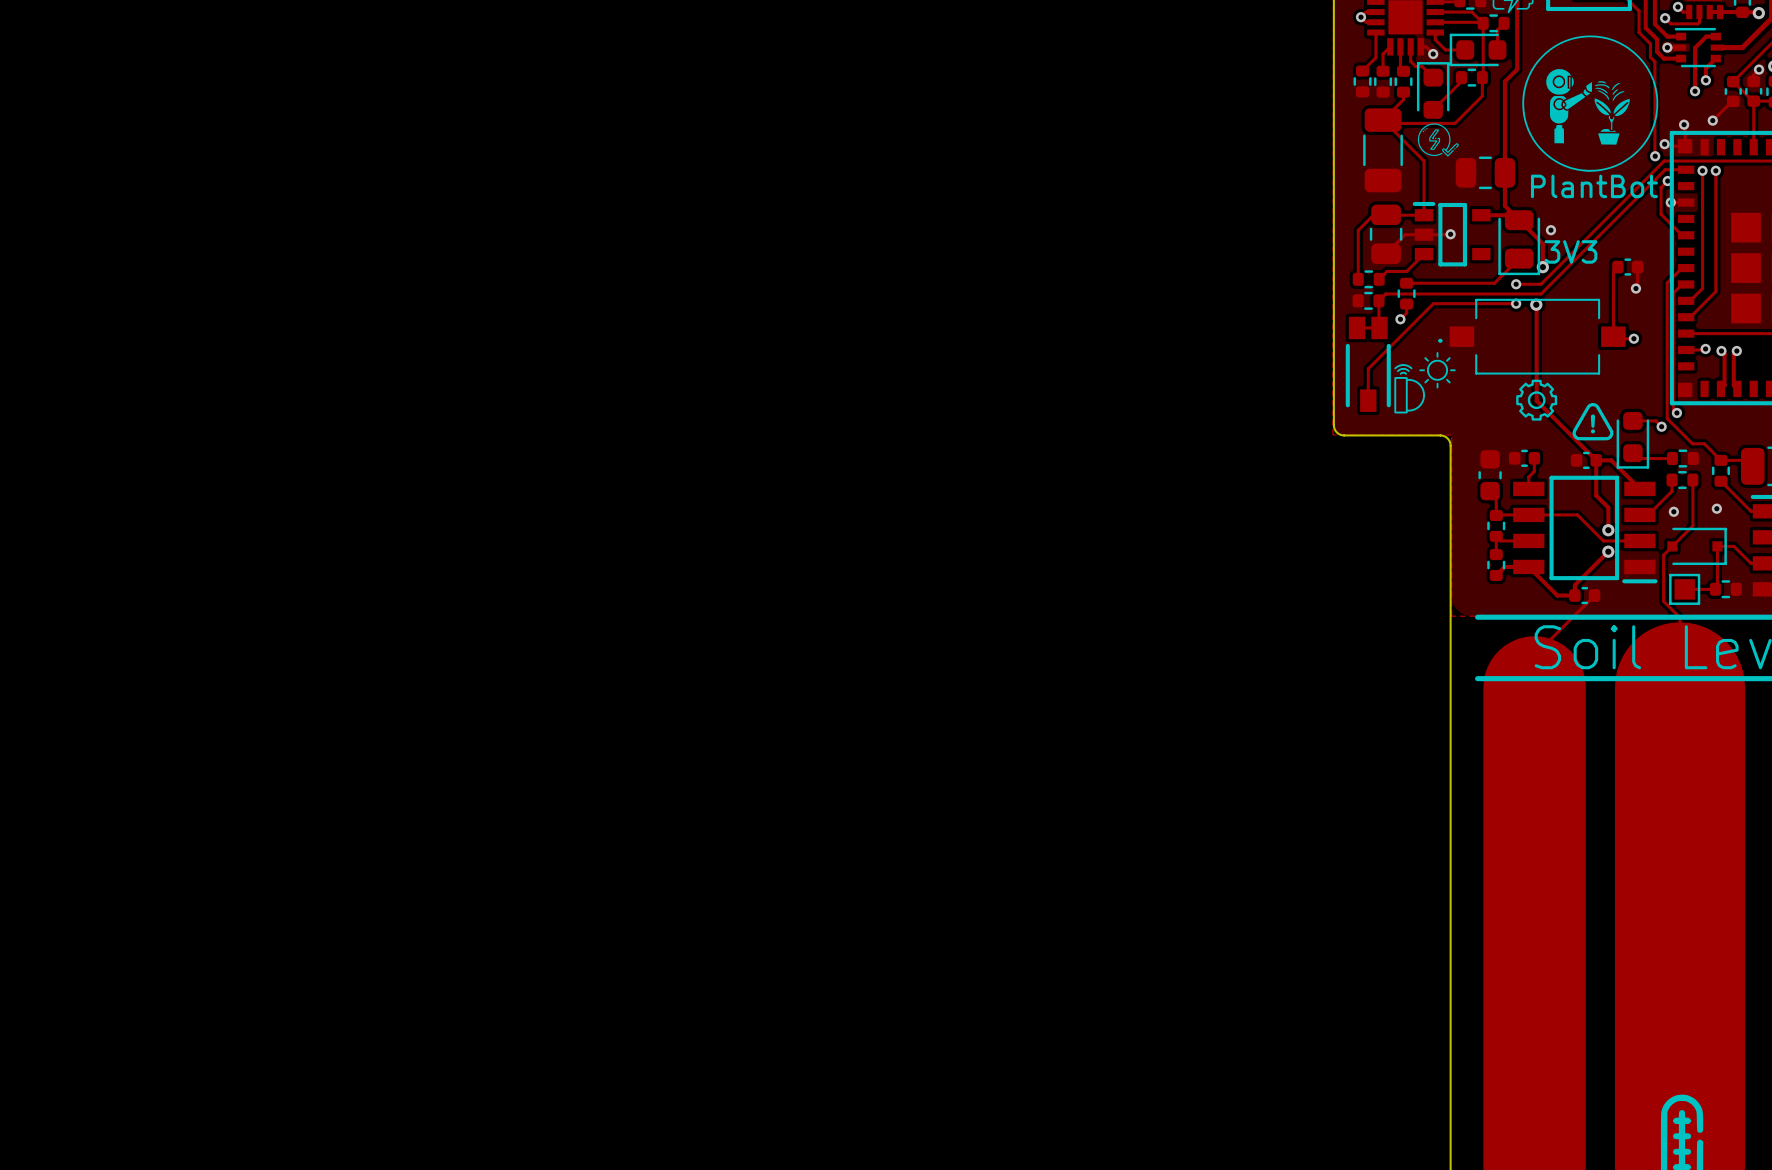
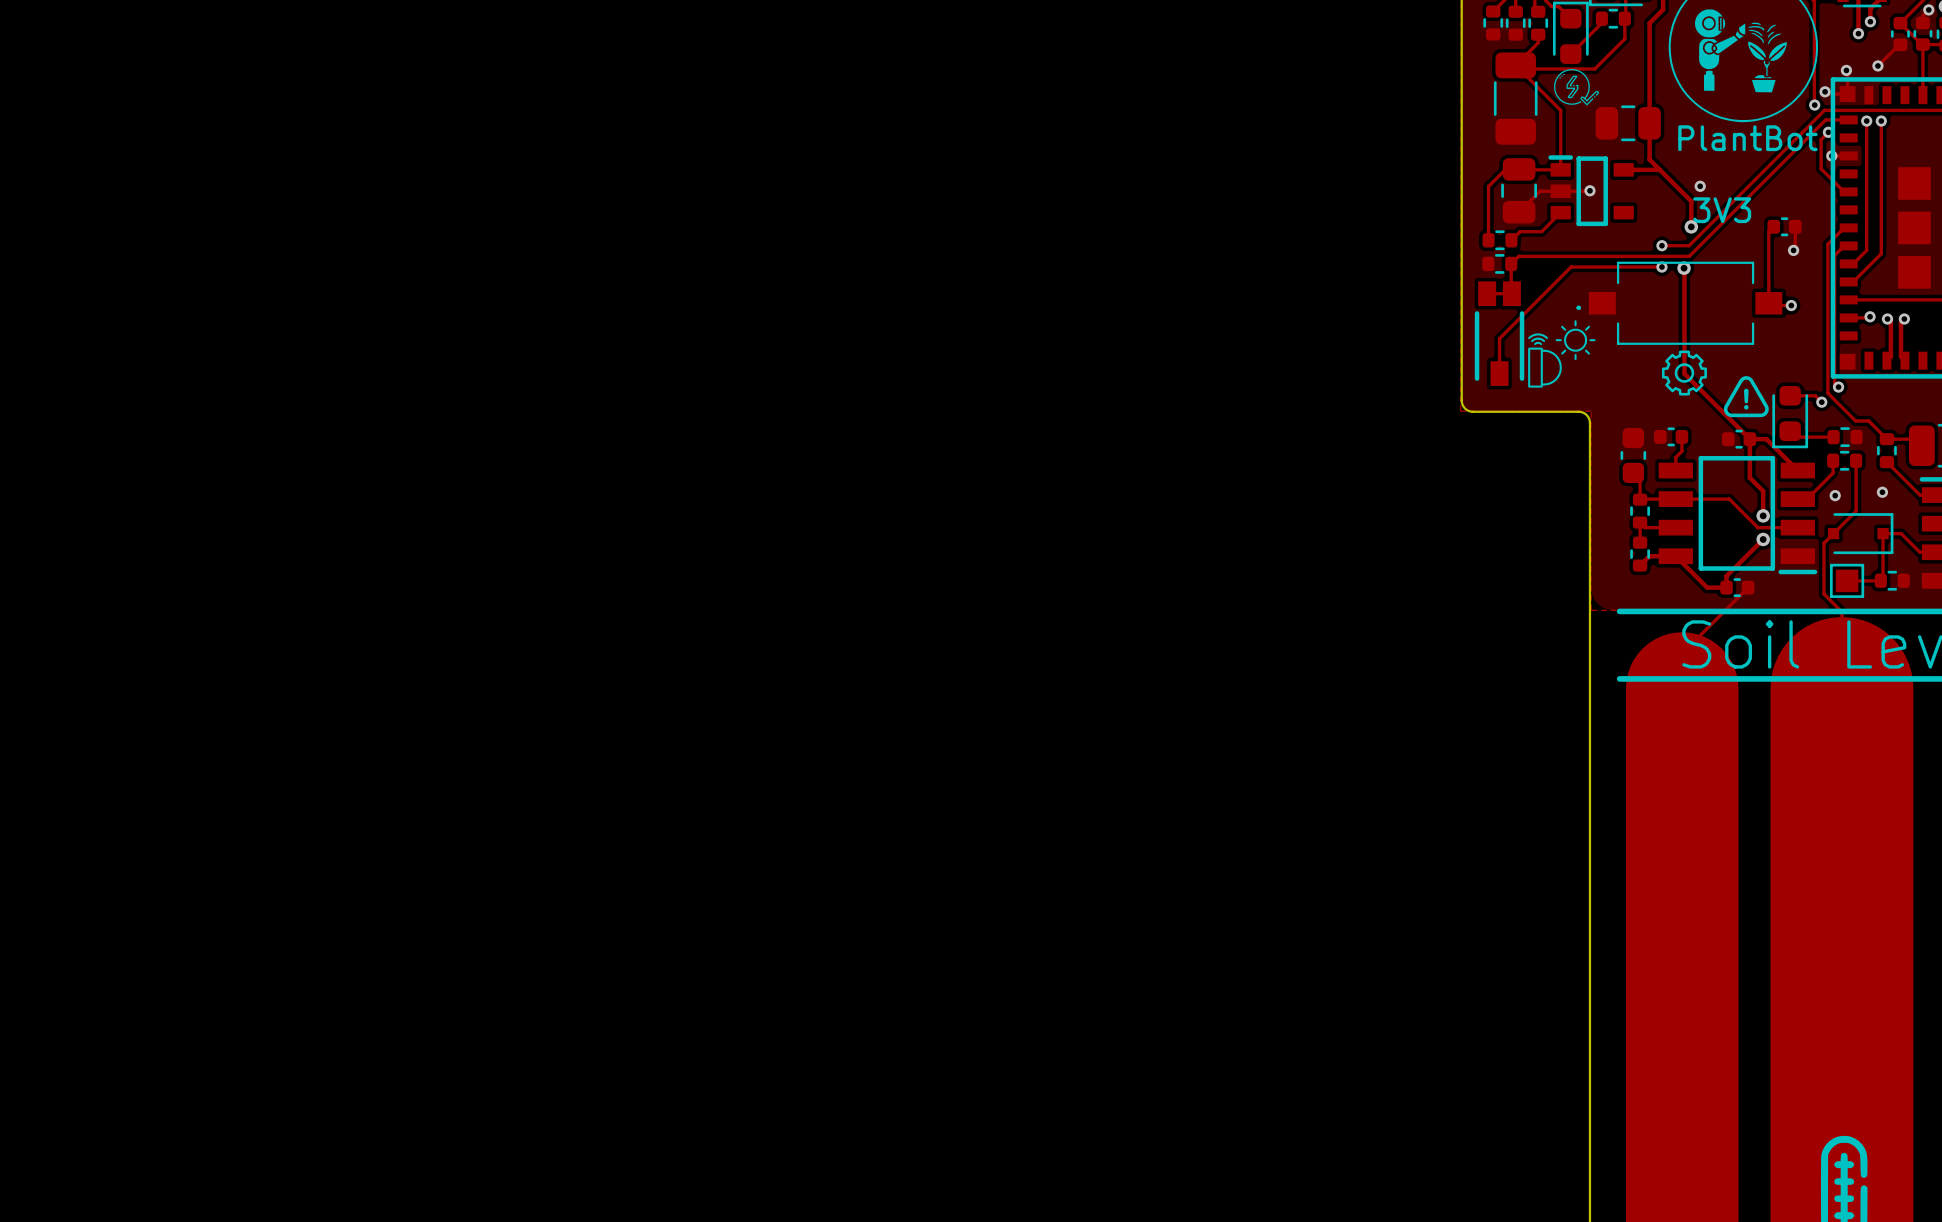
part: (1519, 242) -> none
track: (1519, 258) (1494, 283) (1406, 283) -> none
part: (1406, 293) -> none
track: (1406, 304) (1406, 313) (1400, 319) -> none
via: (1400, 319) -> none

